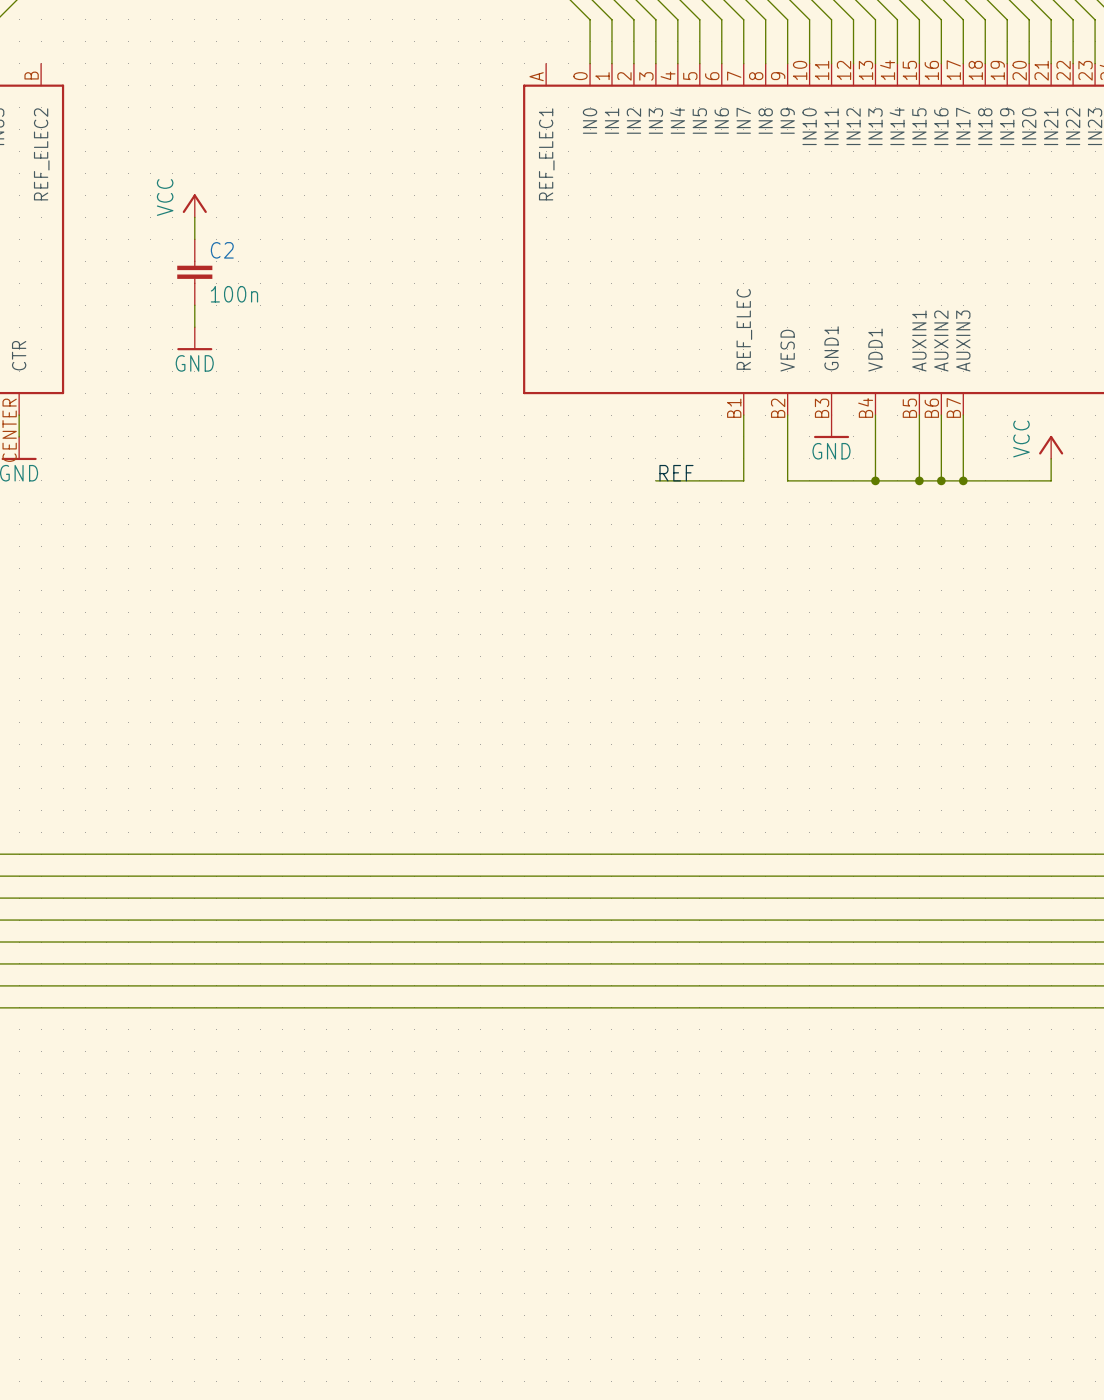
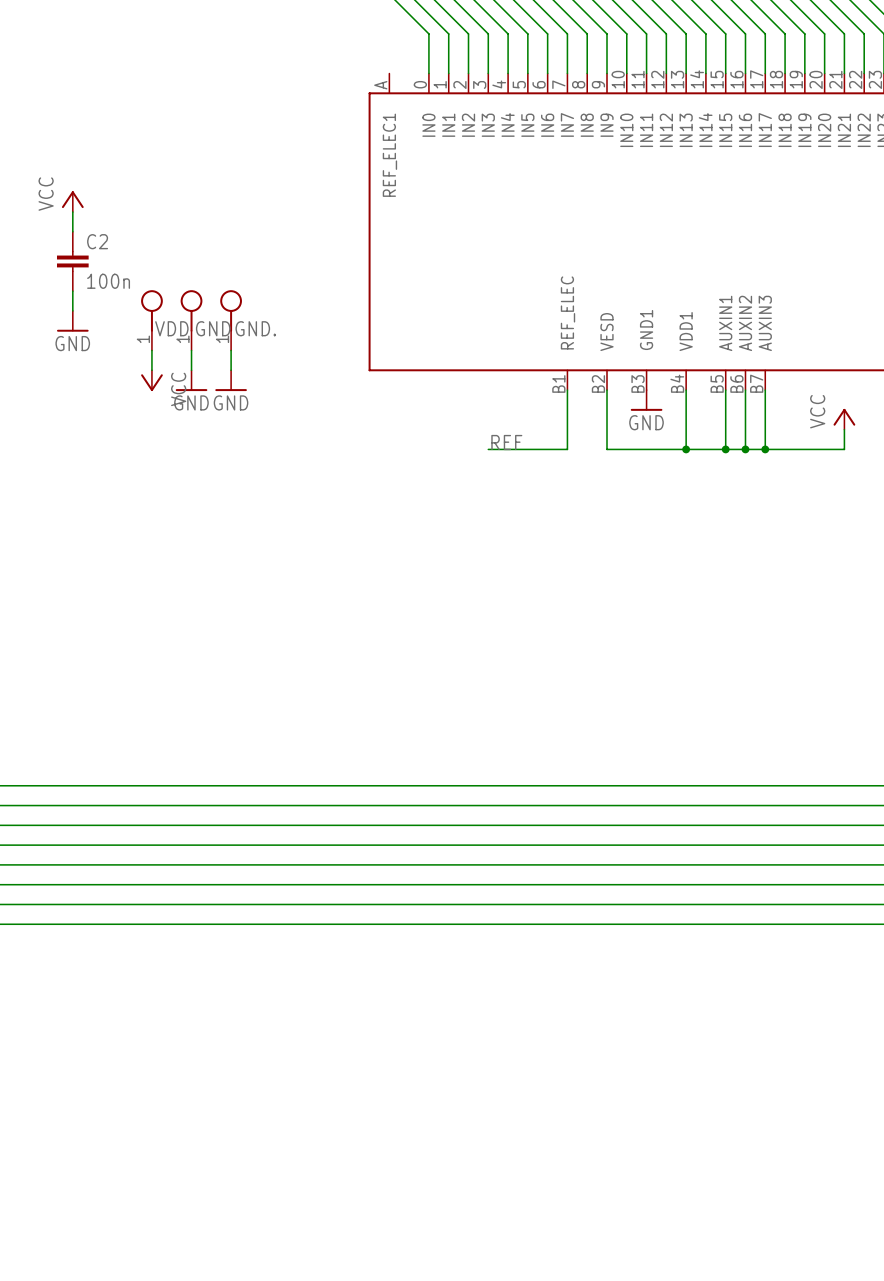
VDD: none -> (151, 320)
GND: none -> (191, 320)
GND.: none -> (231, 320)
wire: none -> (151, 350) (151, 370)
wire: none -> (191, 350) (191, 370)
wire: none -> (231, 350) (231, 370)
power symbol: none -> VCC (151, 380)
power symbol: none -> GND (191, 380)
power symbol: none -> GND (231, 380)

